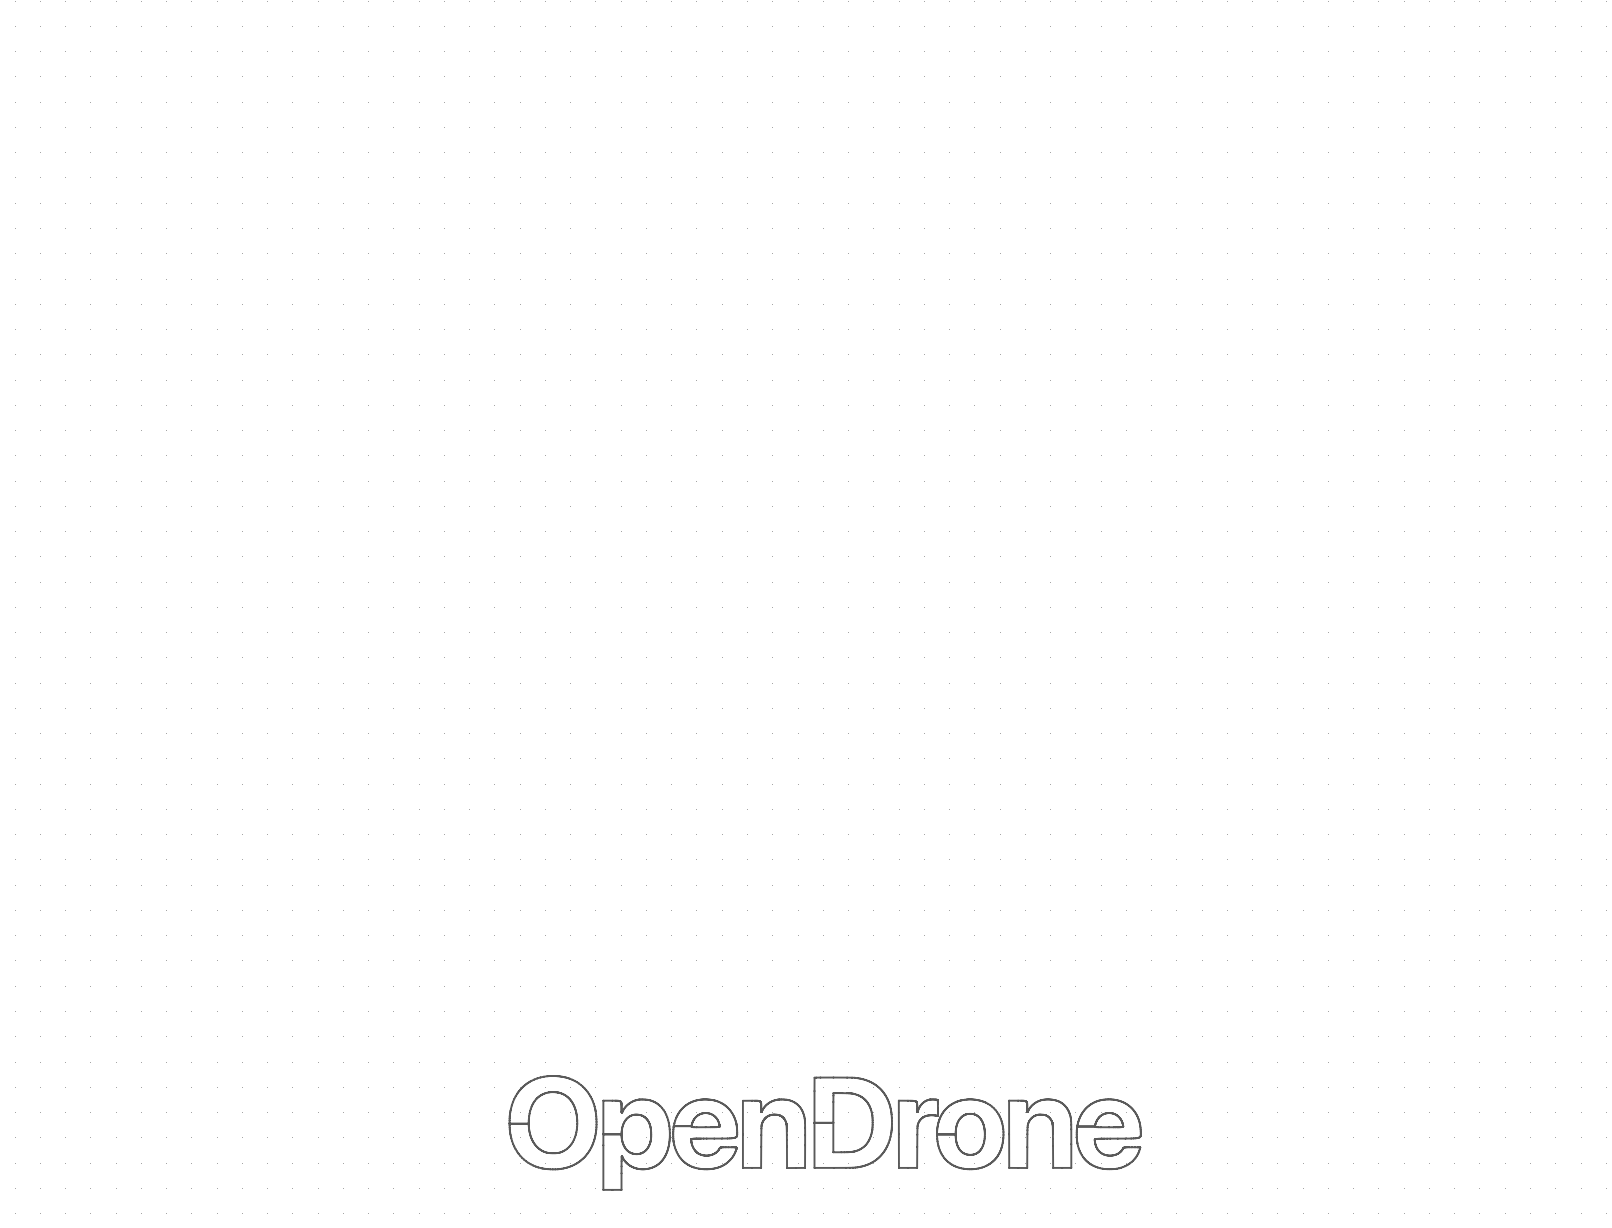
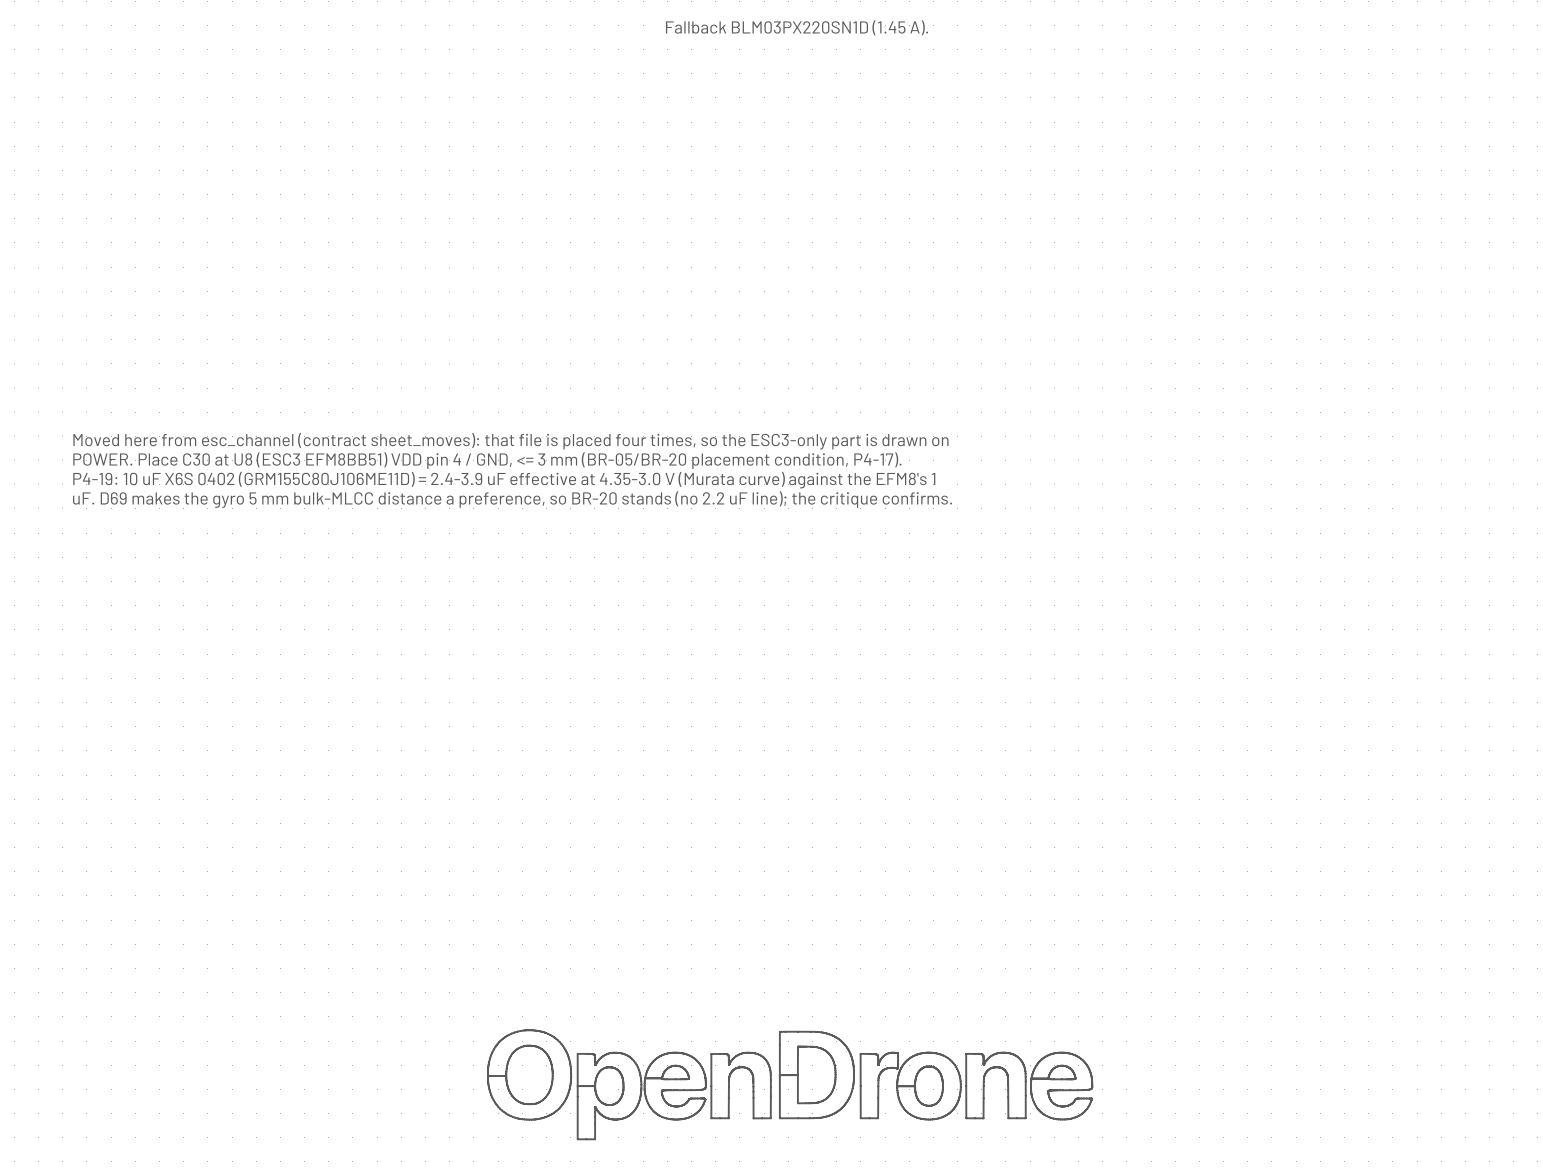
text: none -> Fallback BLM03PX220SN1D (1.45 A). (797, 27)
text: none -> Moved here from esc_channel (contract sheet_moves): that file is placed four times, so the ESC3-only part is drawn on (510, 441)
text: none -> POWER. Place C30 at U8 (ESC3 EFM8BB51) VDD pin 4 / GND, <= 3 mm (BR-05/BR-20 placement condition, P4-17). (487, 460)
text: none -> P4-19: 10 uF X6S 0402 (GRM155C80J106ME11D) = 2.4-3.9 uF effective at 4.35-3.0 V (Murata curve) against the EFM8's 1 (504, 480)
text: none -> uF. D69 makes the gyro 5 mm bulk-MLCC distance a preference, so BR-20 stands (no 2.2 uF line); the critique confirms. (512, 499)

